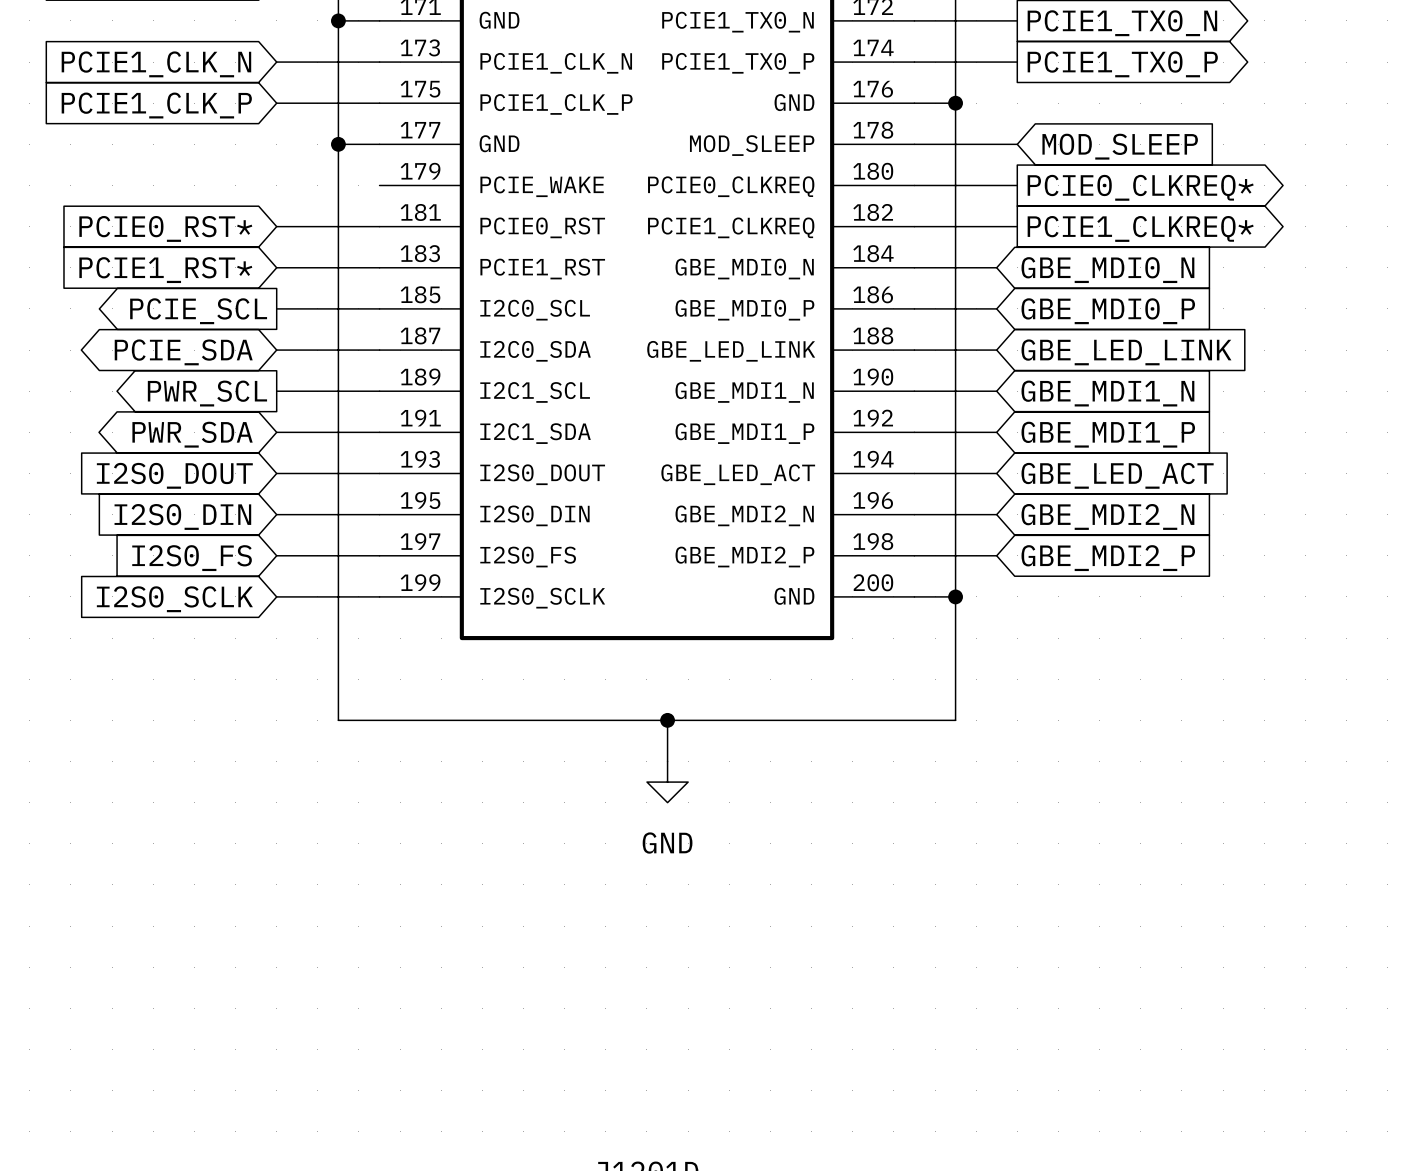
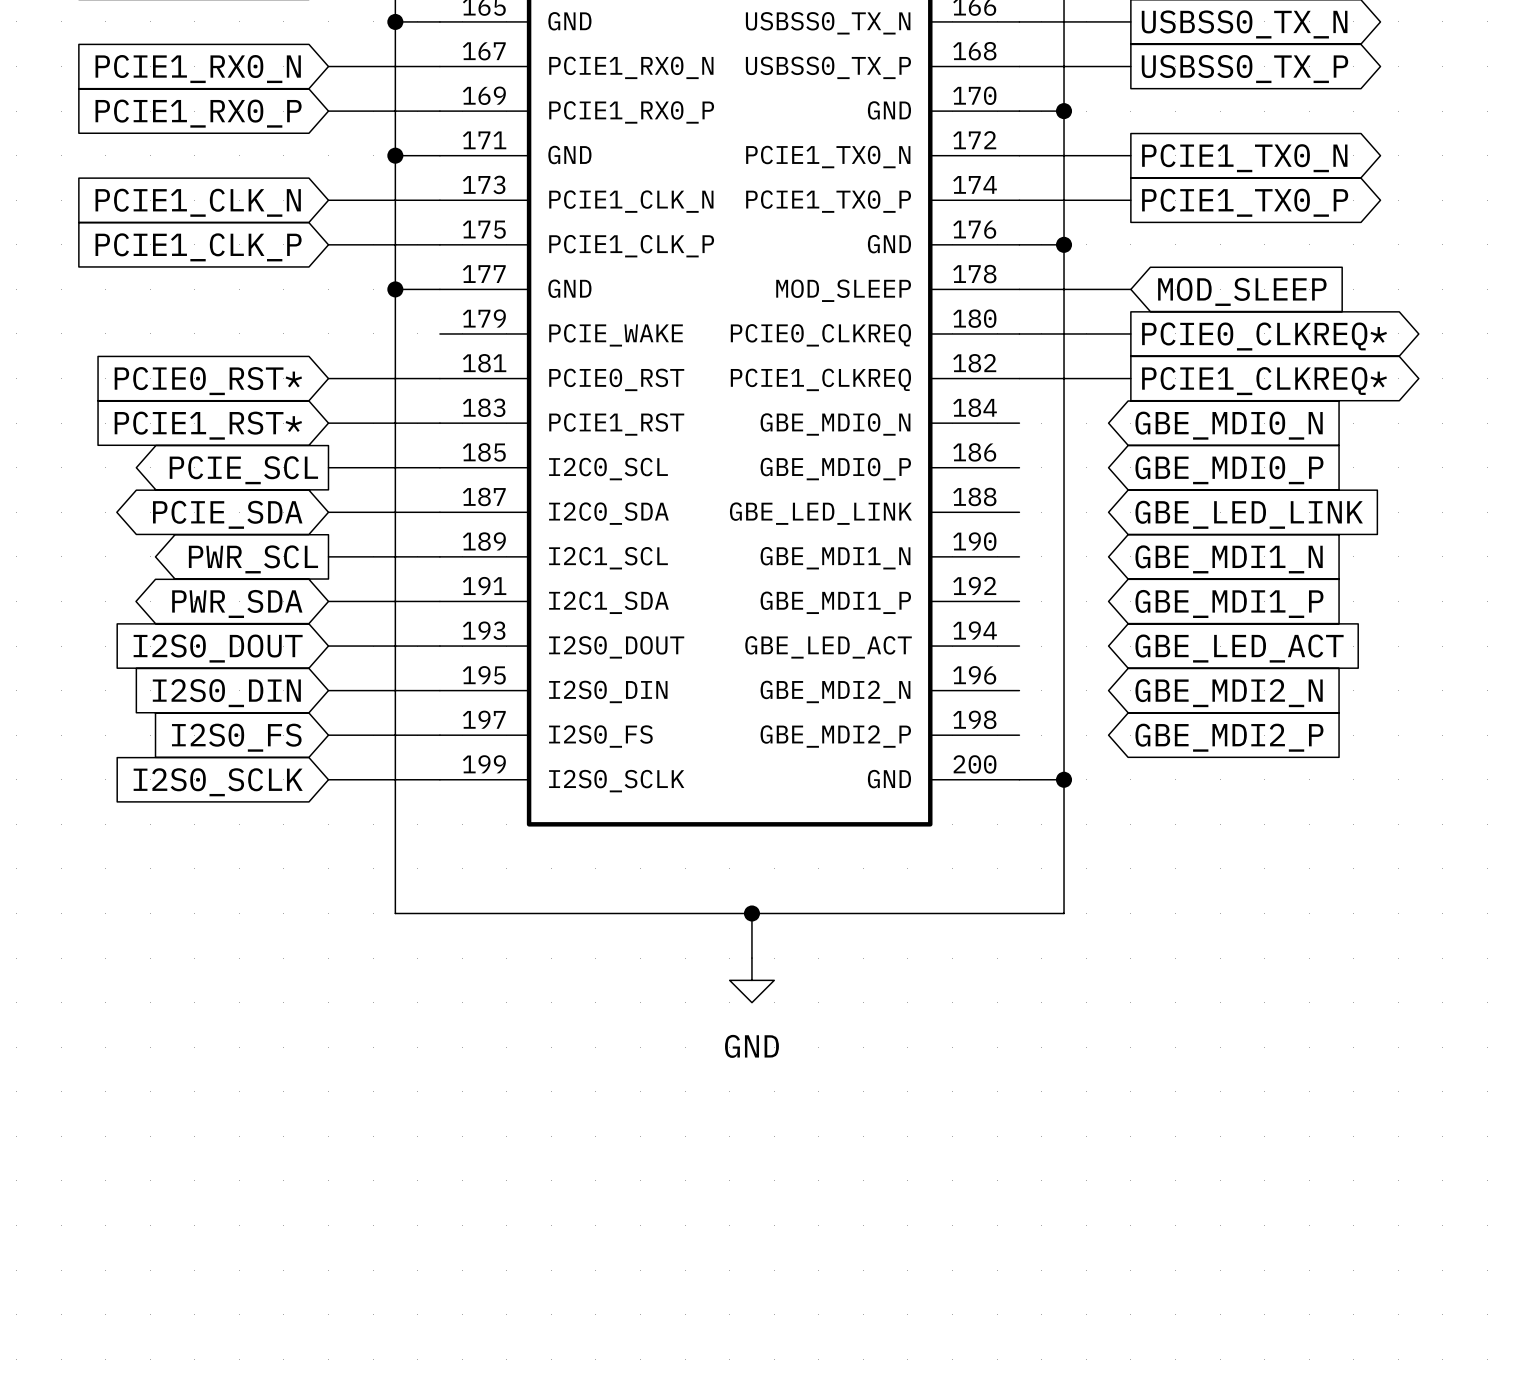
wire: (914, 267) (996, 267) -> none
wire: (914, 308) (996, 308) -> none
wire: (914, 350) (996, 350) -> none
wire: (914, 391) (996, 391) -> none
wire: (914, 432) (996, 432) -> none
wire: (914, 473) (996, 473) -> none
wire: (914, 514) (996, 514) -> none
wire: (914, 555) (996, 555) -> none

